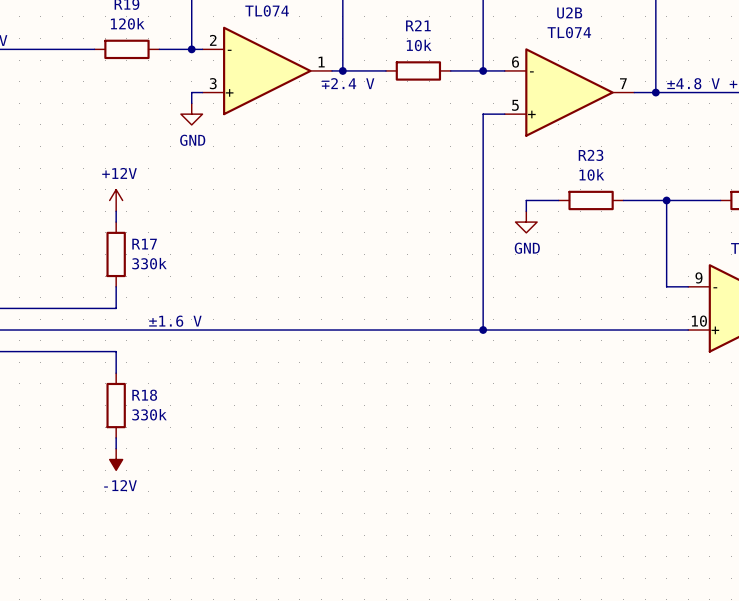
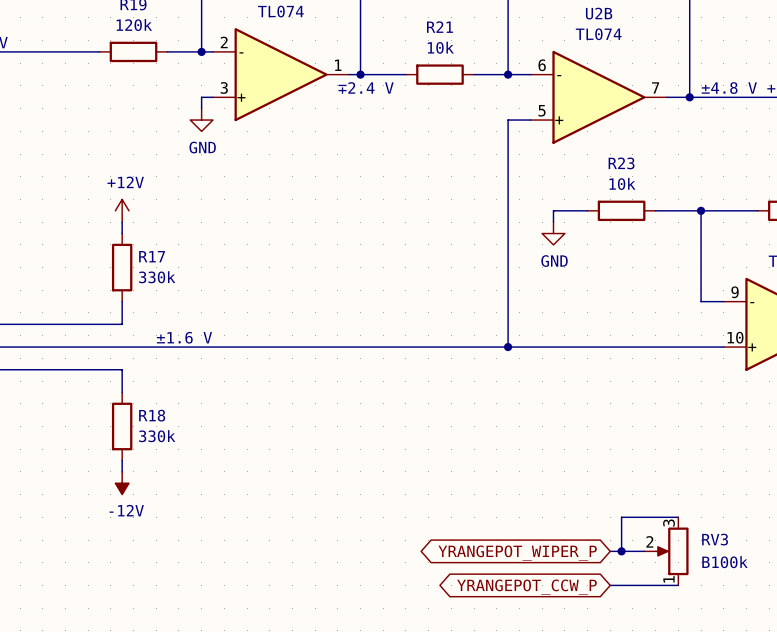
wire: none -> (678, 517) (621, 517) (621, 551)
wire: none -> (610, 551) (644, 551)
junction: none -> (621, 551)
RV3: none -> B100k (666, 551)
global label: none -> YRANGEPOT_WIPER_P (517, 553)
wire: none -> (610, 585) (678, 585)
global label: none -> YRANGEPOT_CCW_P (526, 587)

